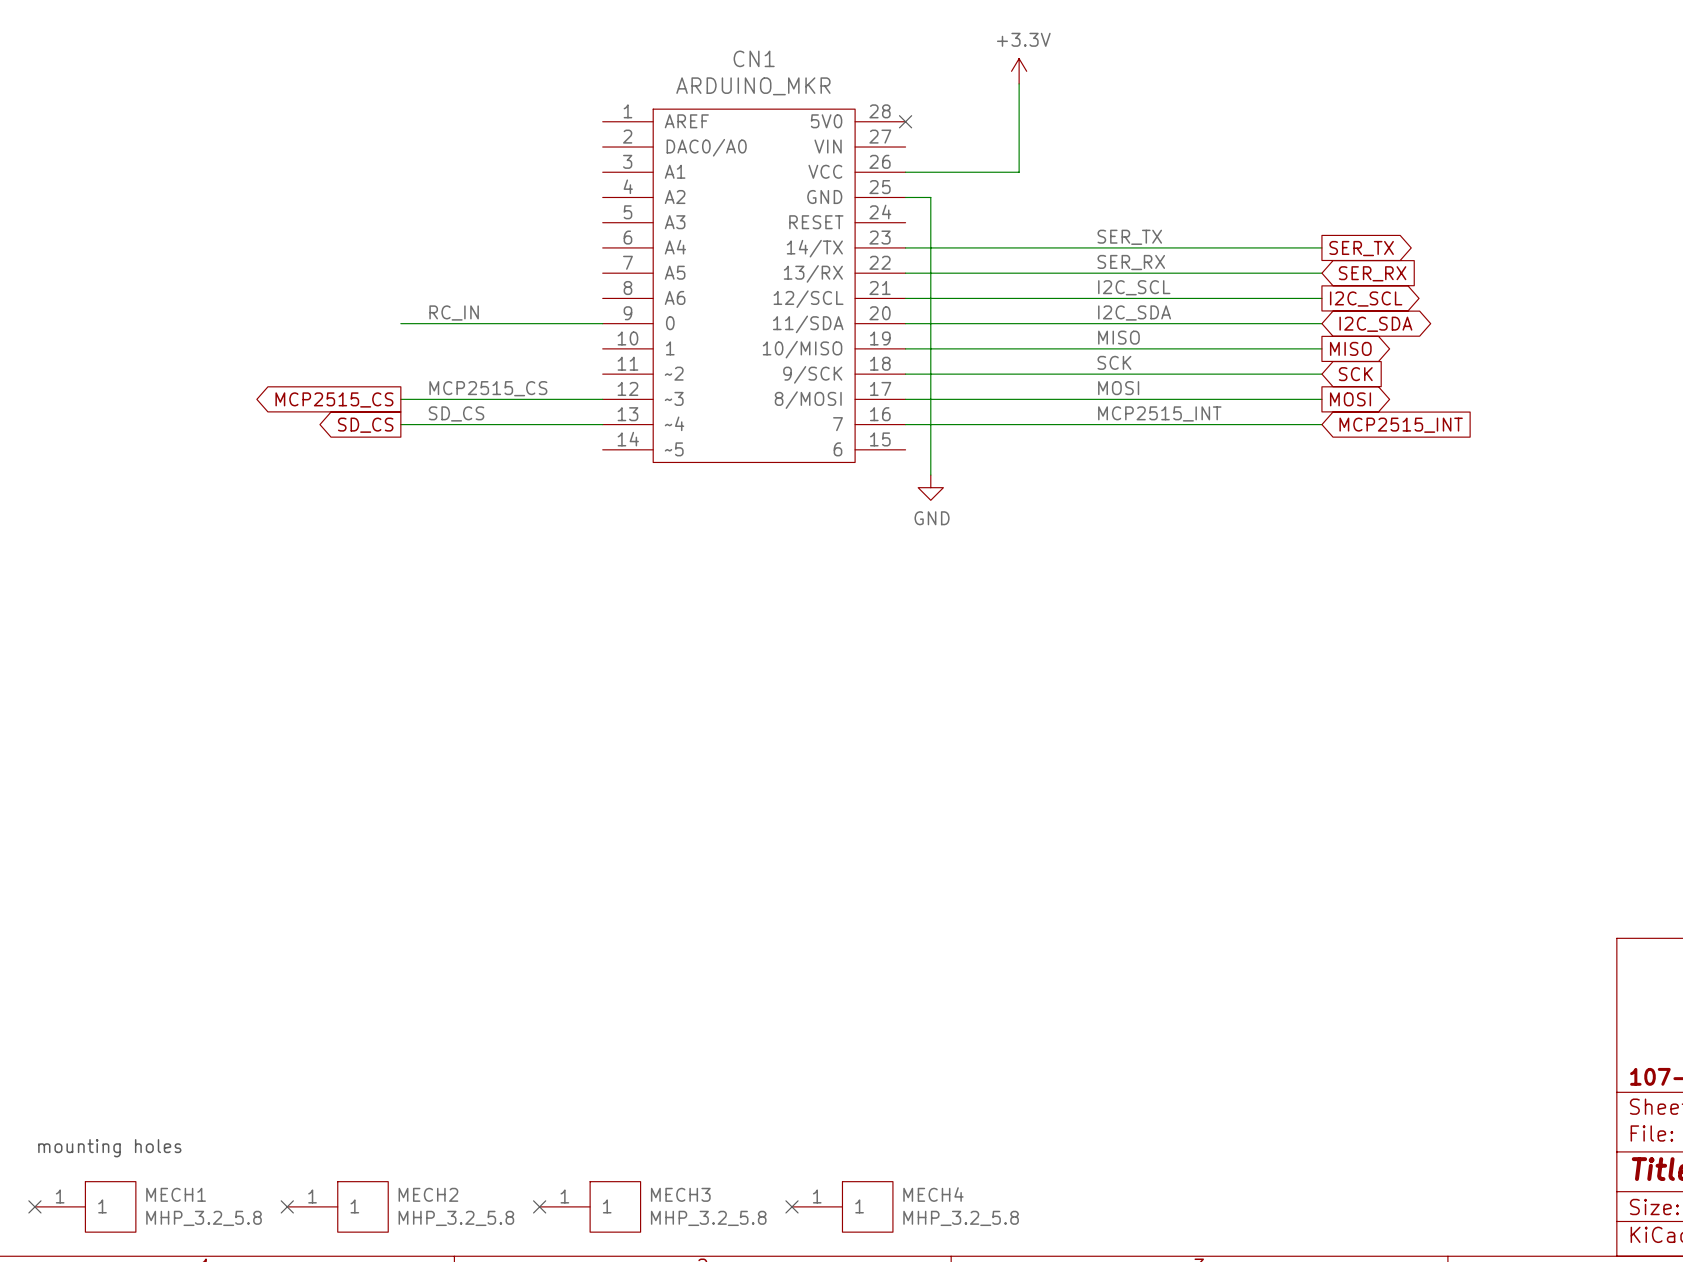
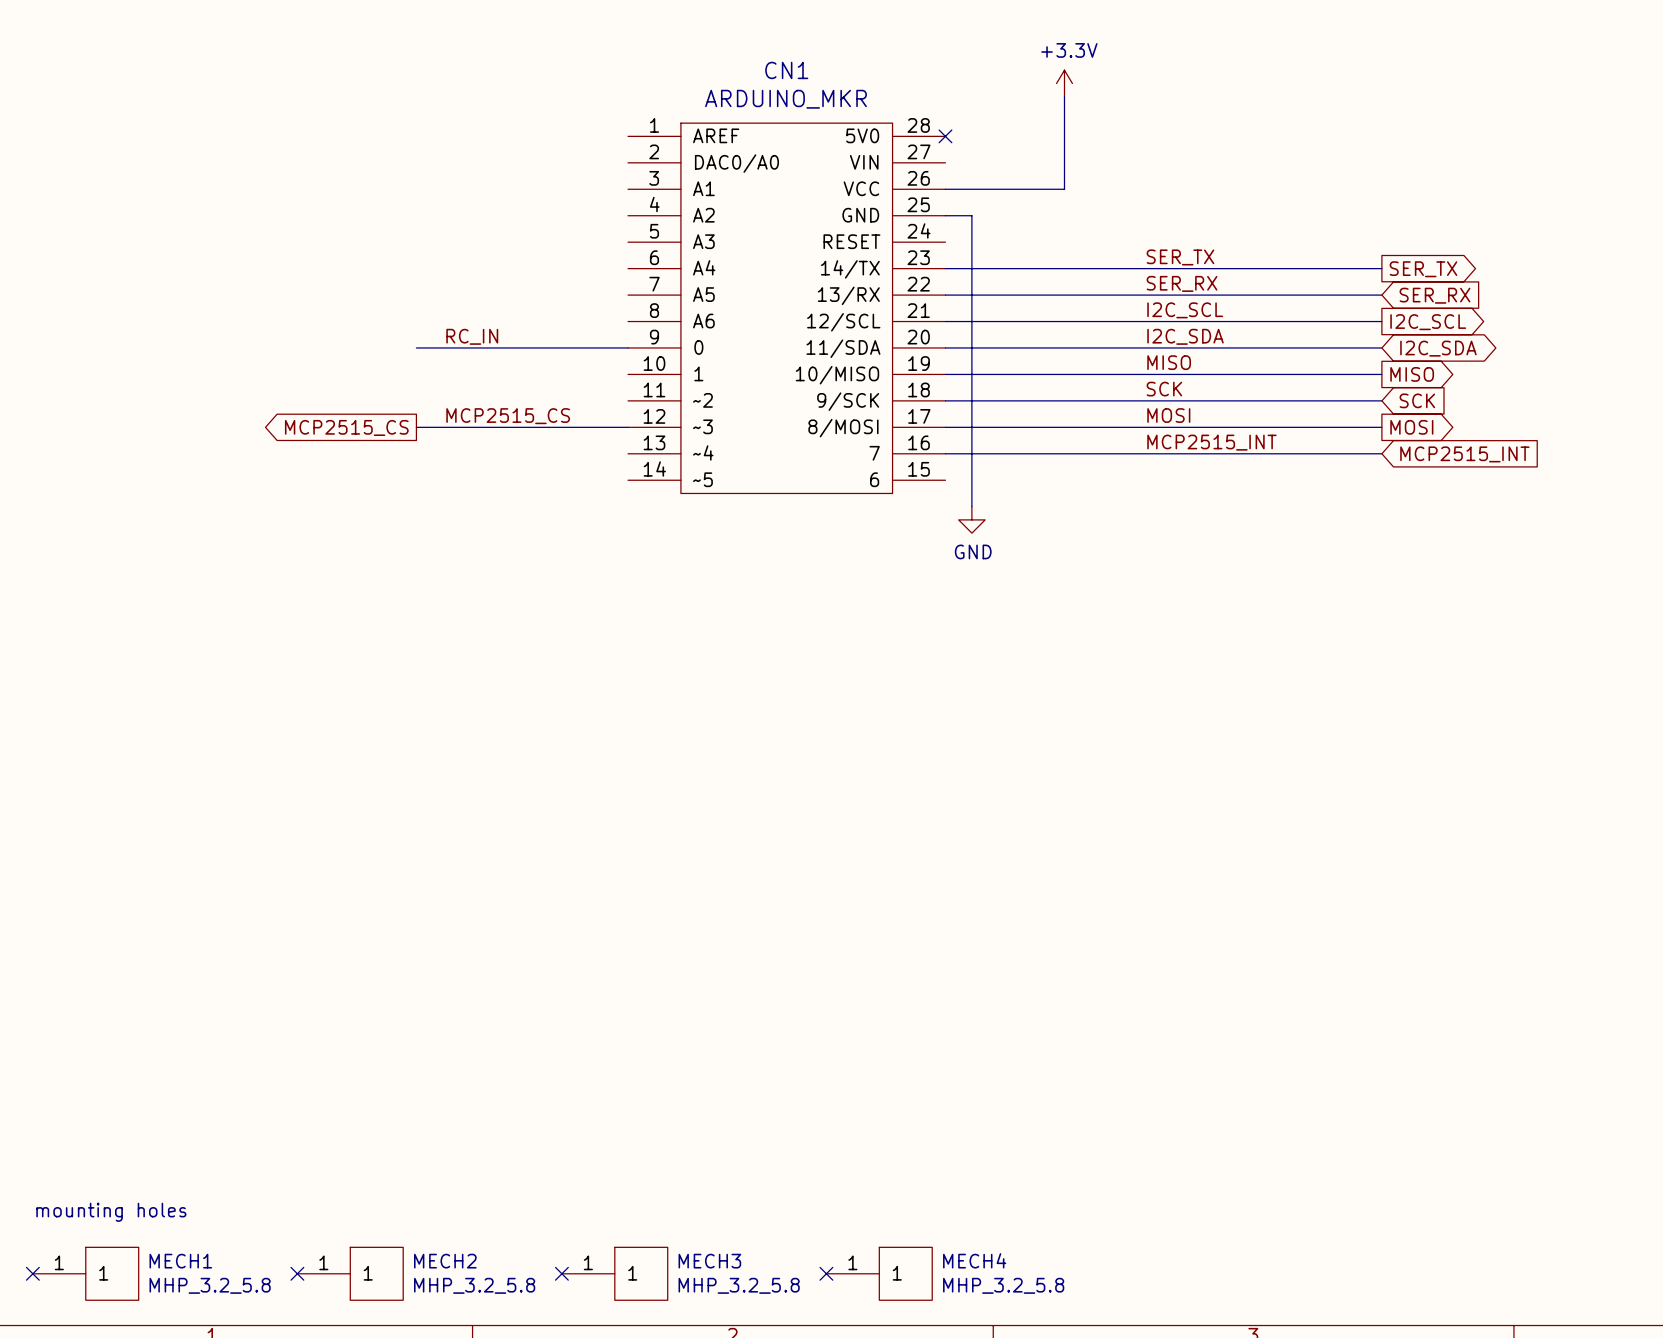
label: SD_CS (456, 413) -> none
wire: (400, 424) (602, 424) -> none
global label: SD_CS (365, 425) -> none

